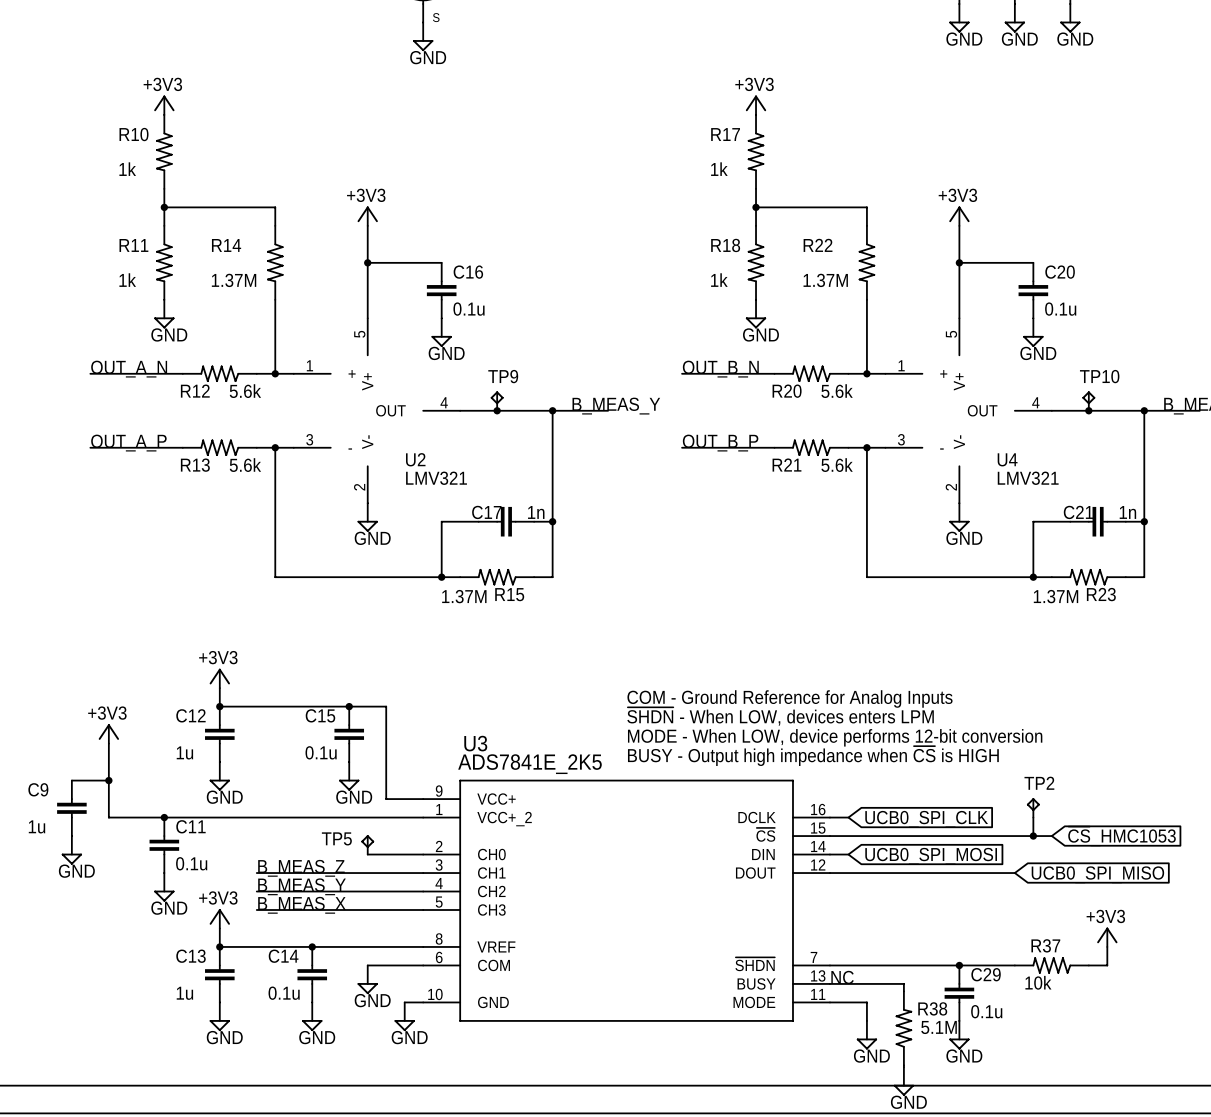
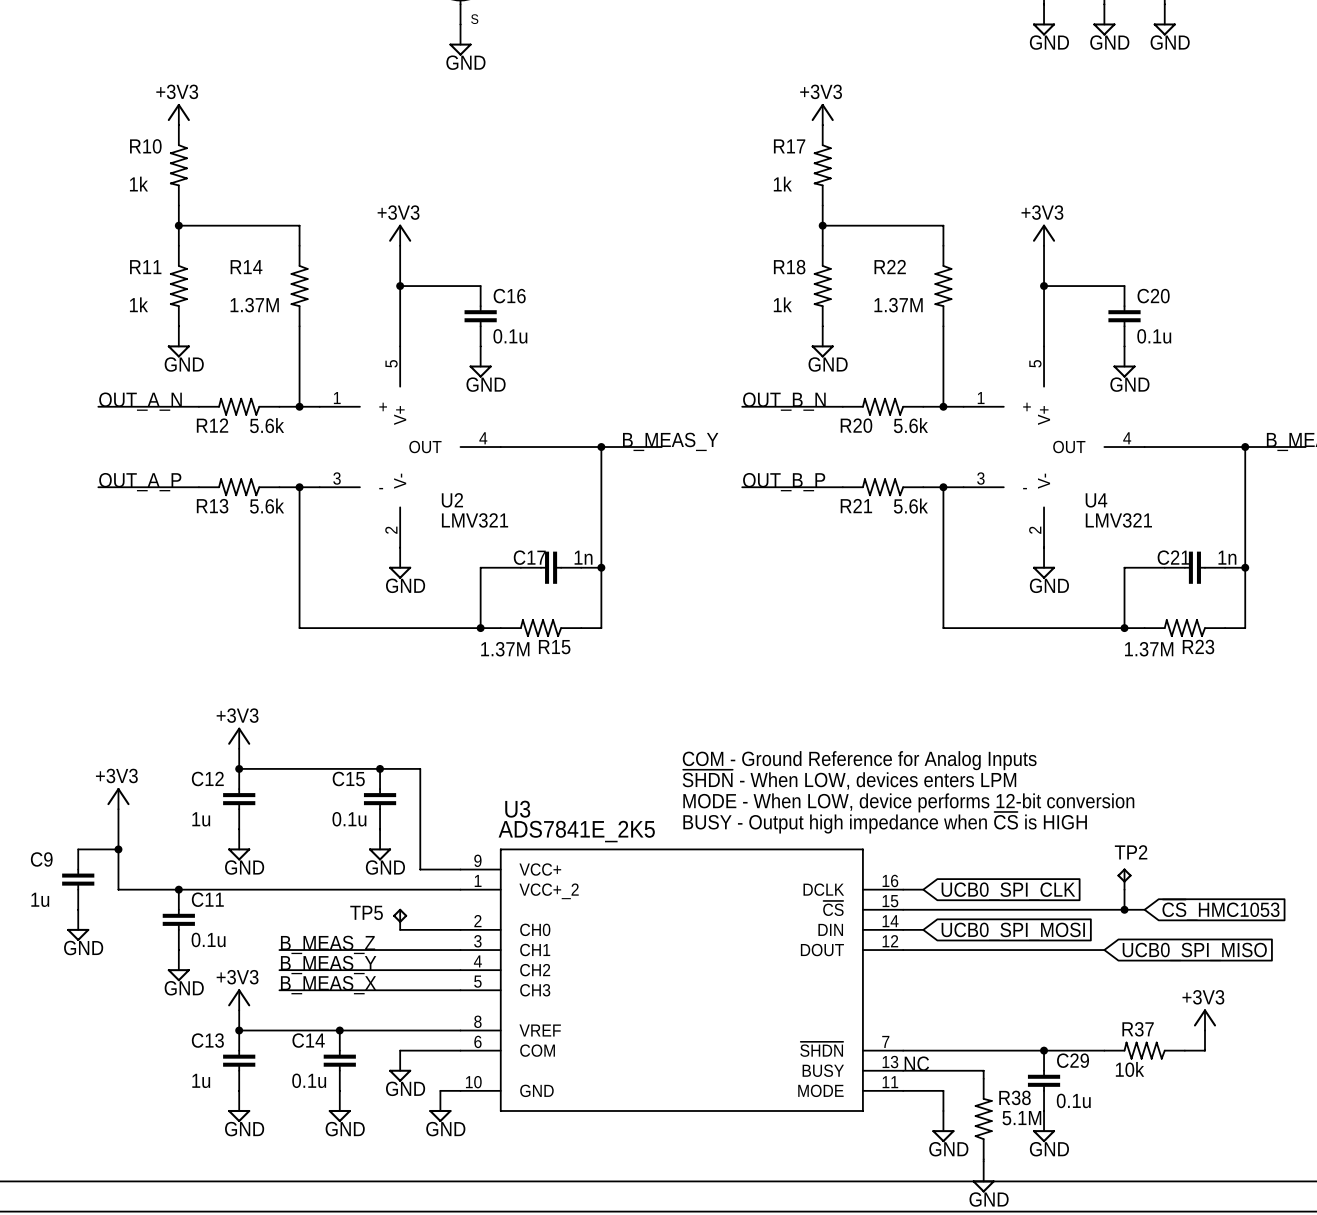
TP9: (497, 401) -> none
TP10: (1088, 401) -> none
junction: (497, 410) -> none
junction: (1088, 410) -> none

